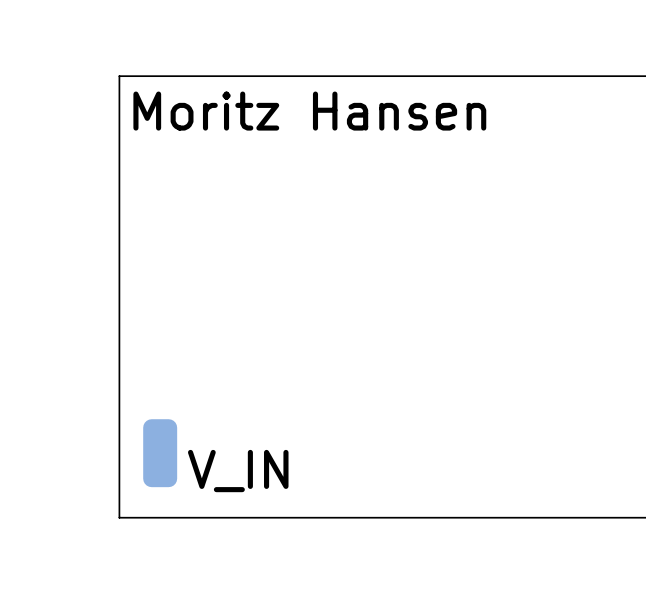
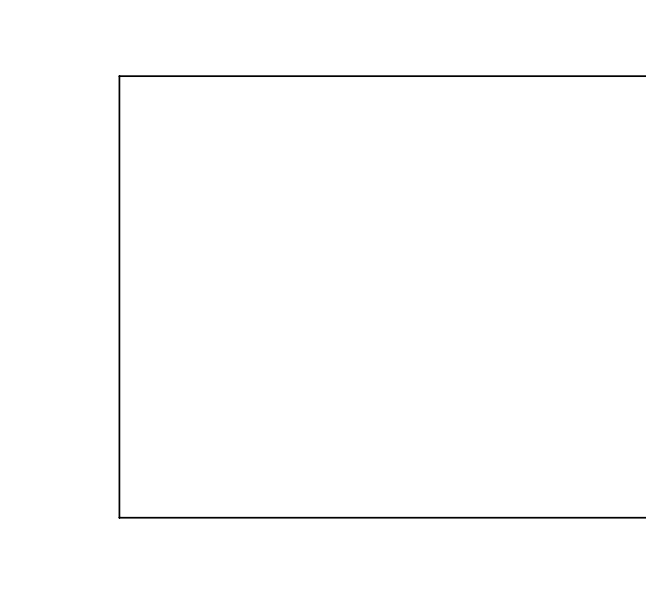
text: Moritz Hansen (309, 111) -> none
part: (160, 453) -> none
text: V_IN (238, 471) -> none

